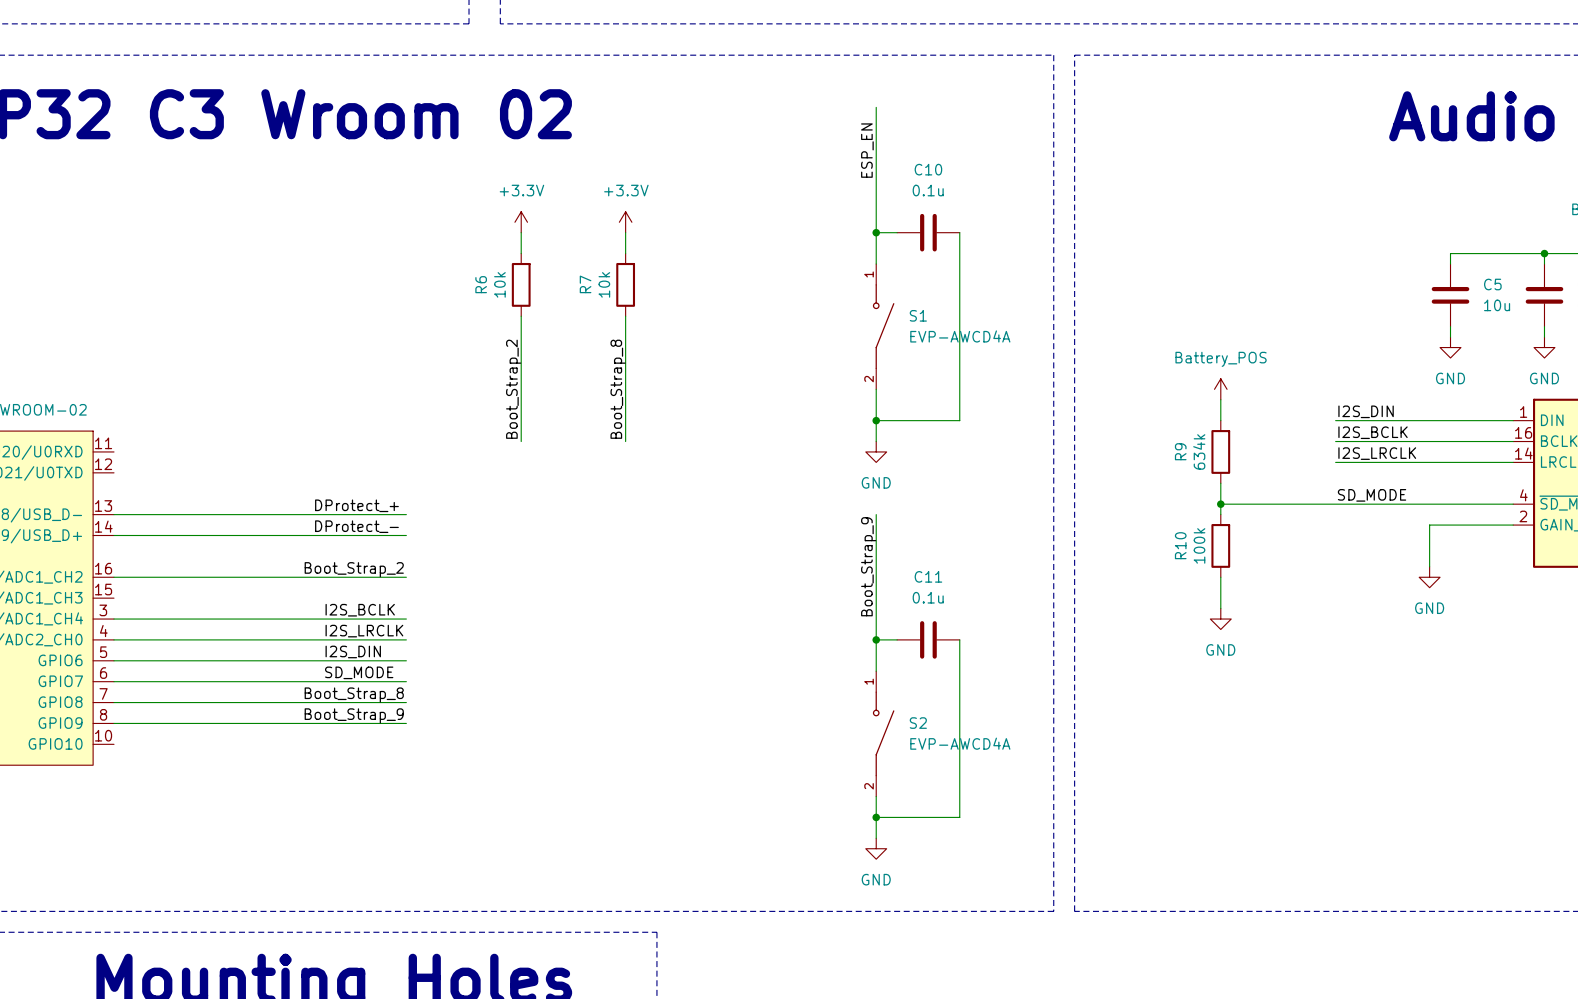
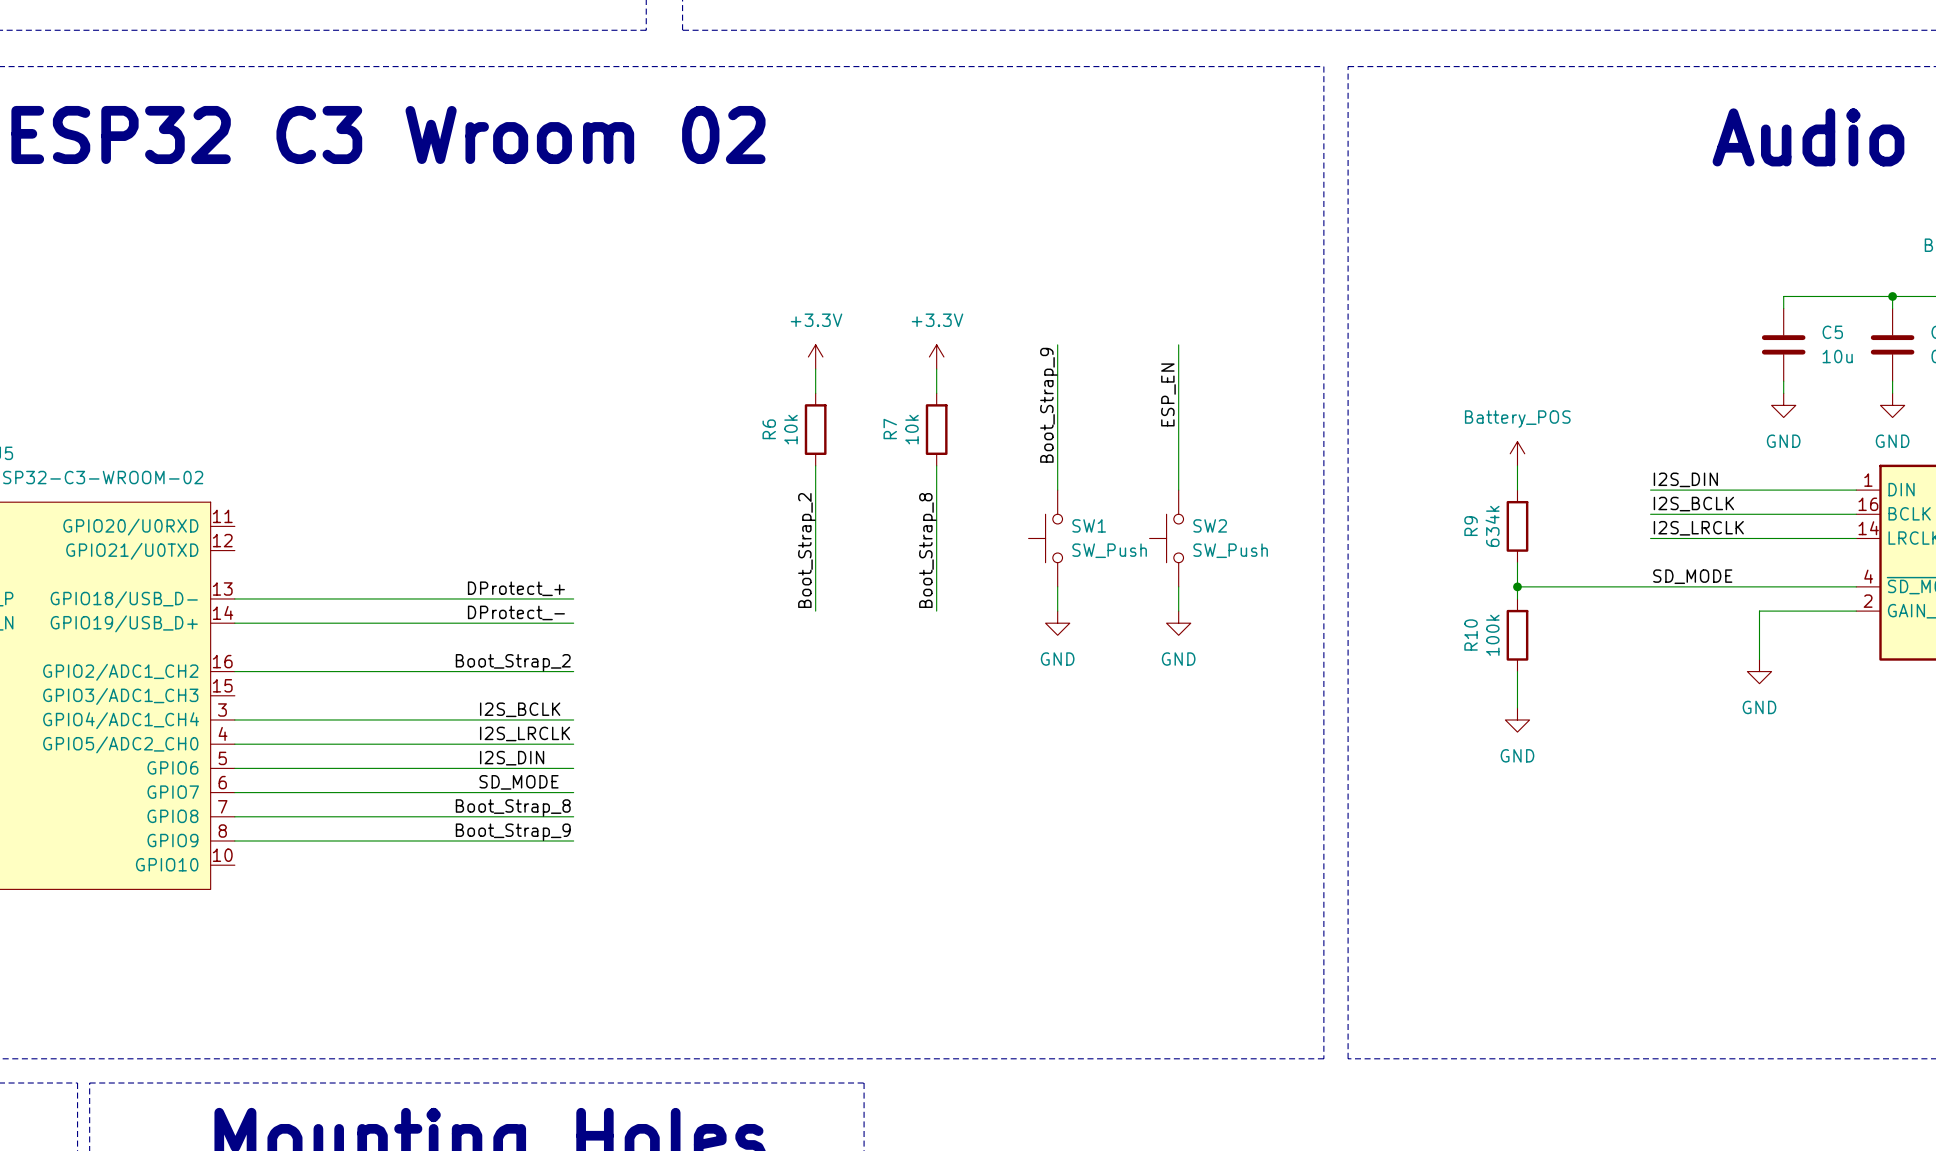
wire: (876, 107) (876, 264) -> none
label position: ESP_EN (867, 150) -> ESP_EN (1168, 394)
power symbol: +3.3V (521, 222) -> none
power symbol: +3.3V (625, 222) -> none
wire: (521, 232) (521, 253) -> (815, 369) (815, 393)
wire: (625, 232) (625, 253) -> (936, 369) (936, 393)
wire: (876, 232) (897, 232) -> none
junction: (876, 232) -> none
C10: 0.1u (928, 232) -> none
wire: (959, 232) (959, 420) (876, 420) -> none
R6 position: (521, 284) -> (815, 429)
R7 position: (625, 284) -> (936, 429)
wire: none -> (1057, 344) (1057, 490)
wire: none -> (1178, 344) (1178, 490)
power symbol: none -> +3.3V (815, 356)
power symbol: none -> +3.3V (936, 356)
wire: (521, 316) (521, 441) -> (815, 465) (815, 611)
wire: (625, 316) (625, 441) -> (936, 465) (936, 611)
S1: EVP-AWCD4A (883, 326) -> none
label: none -> Boot_Strap_9 (1048, 405)
label position: Boot_Strap_2 (513, 389) -> Boot_Strap_2 (806, 550)
label position: Boot_Strap_8 (618, 389) -> Boot_Strap_8 (927, 550)
wire: (876, 389) (876, 441) -> none
junction: (876, 420) -> none
power symbol: GND (876, 451) -> none
SW1: none -> SW_Push (1045, 538)
SW2: none -> SW_Push (1166, 538)
wire: none -> (1057, 586) (1057, 611)
wire: none -> (1178, 586) (1178, 611)
wire: (876, 514) (876, 671) -> none
power symbol: none -> GND (1057, 623)
power symbol: none -> GND (1178, 623)
label: Boot_Strap_9 (868, 566) -> none
wire: (876, 639) (897, 639) -> none
junction: (876, 639) -> none
C11: 0.1u (928, 639) -> none
wire: (959, 639) (959, 817) (876, 817) -> none
S2: EVP-AWCD4A (883, 733) -> none
wire: (876, 796) (876, 838) -> none
junction: (876, 817) -> none
power symbol: GND (876, 848) -> none

